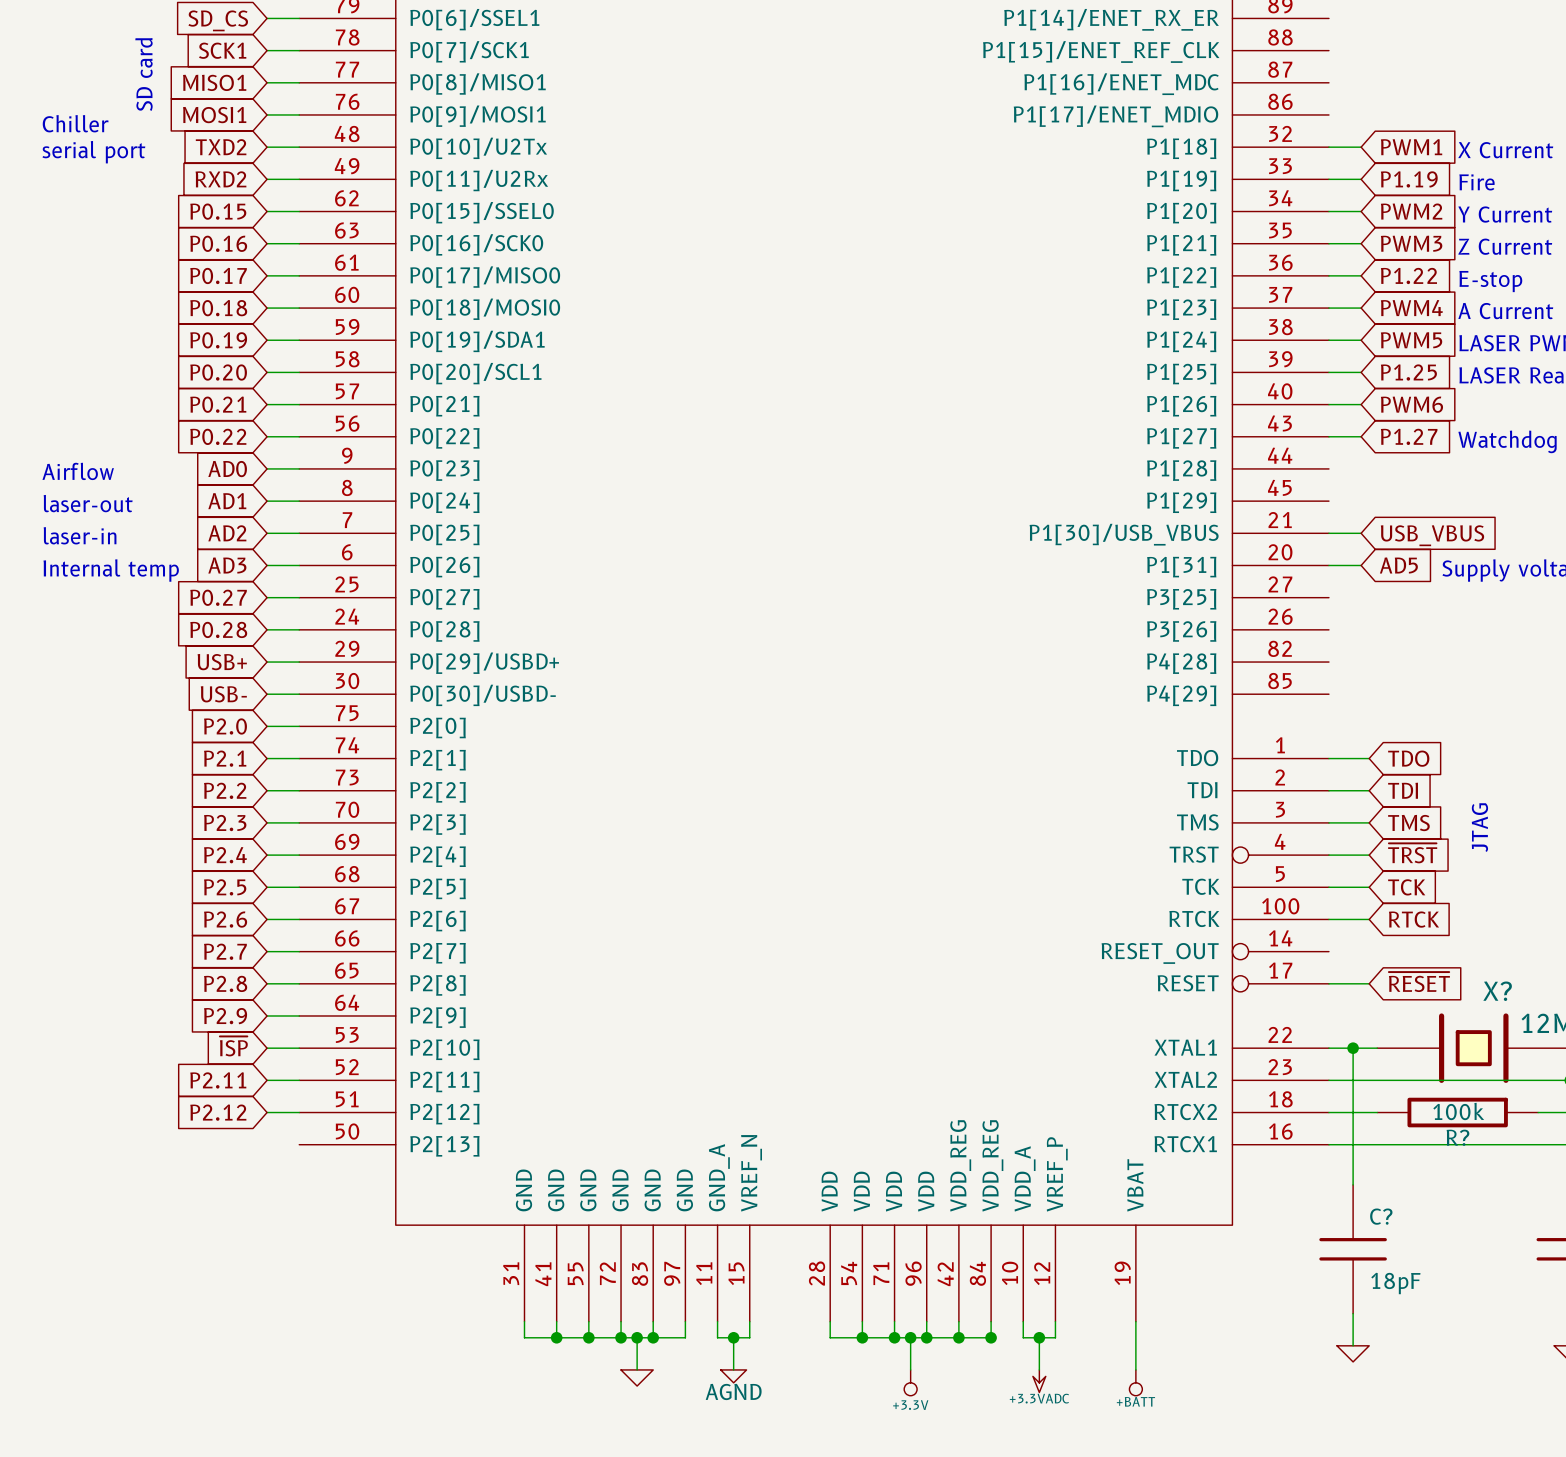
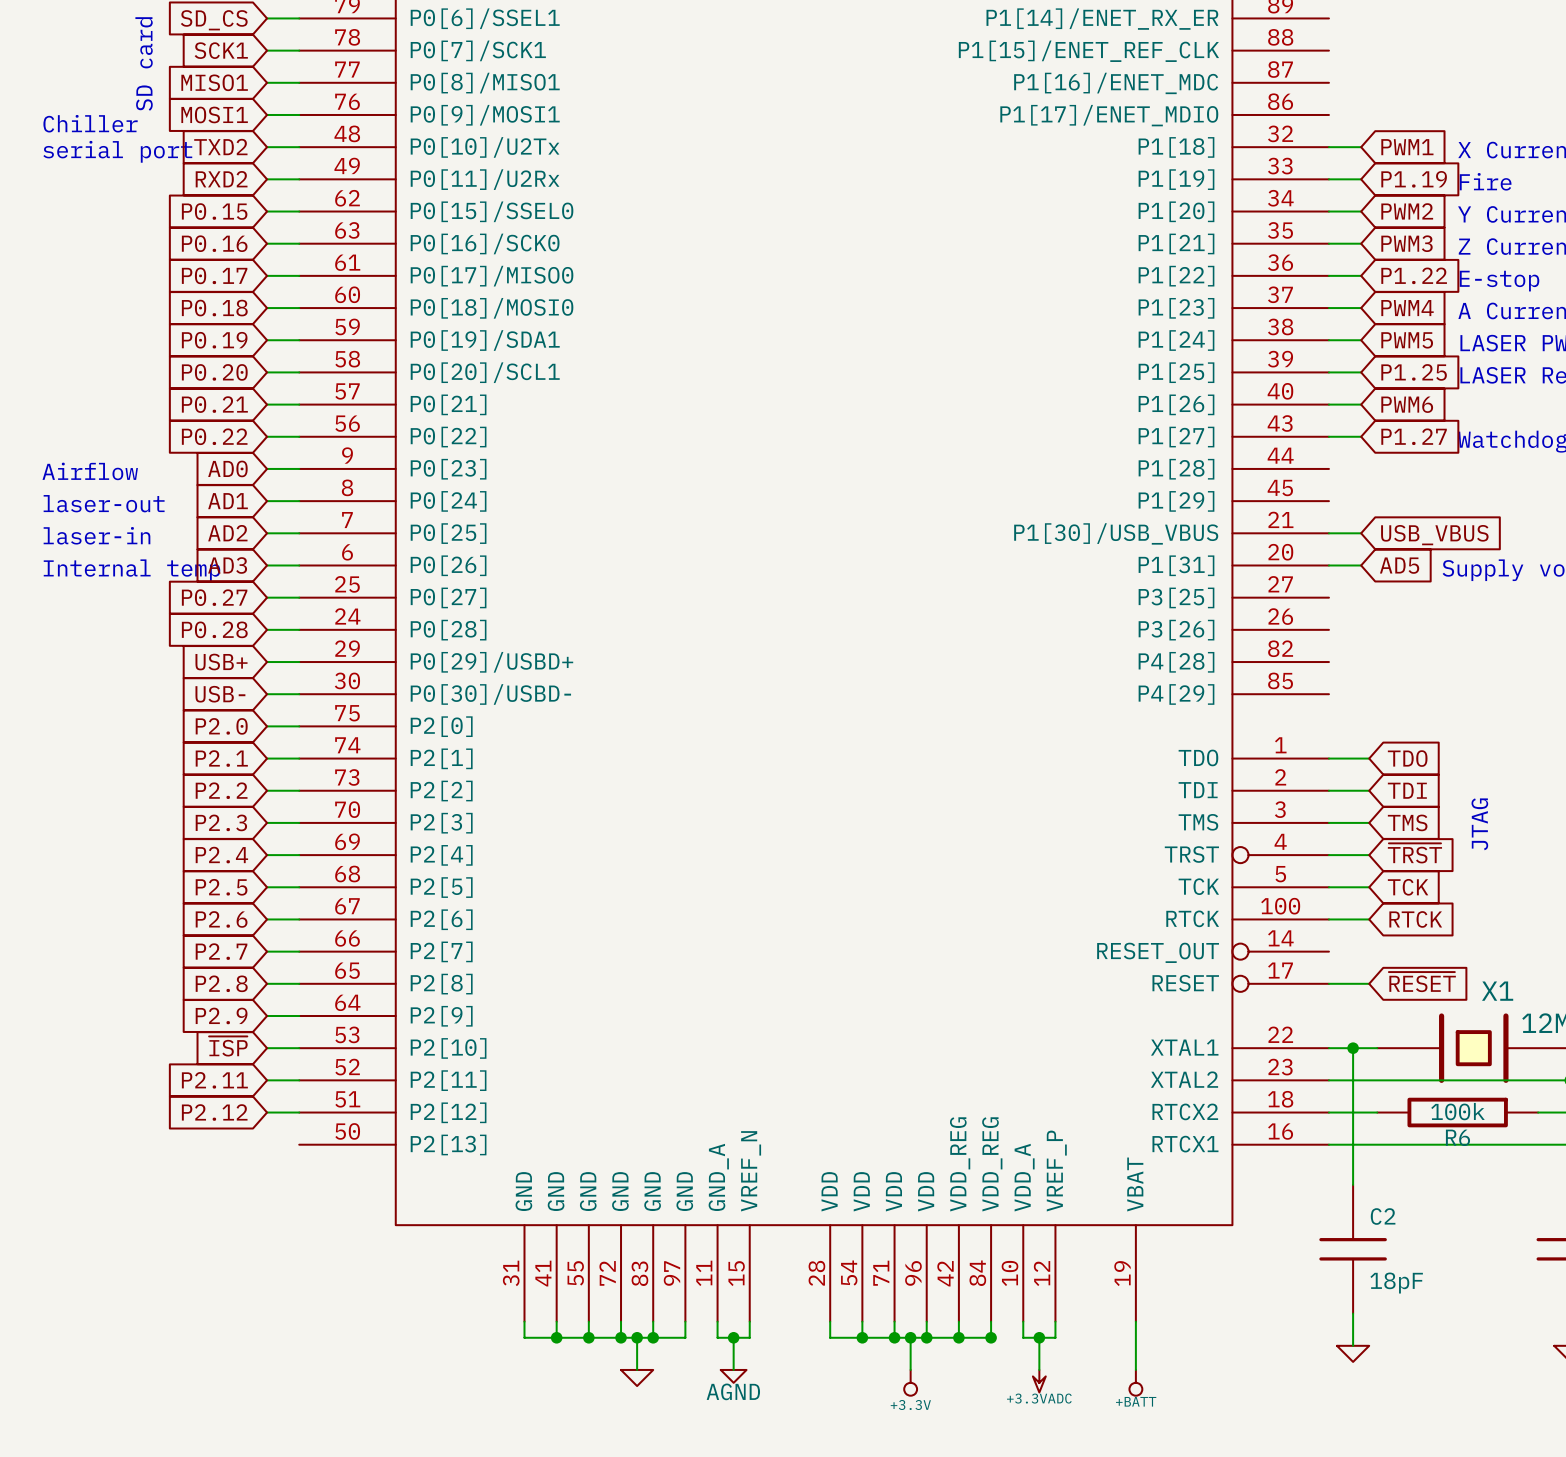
X? name: X? (1497, 991) -> X1 (1497, 991)
R? name: R? (1457, 1137) -> R6 (1457, 1137)
C? name: C? (1381, 1216) -> C2 (1383, 1216)

